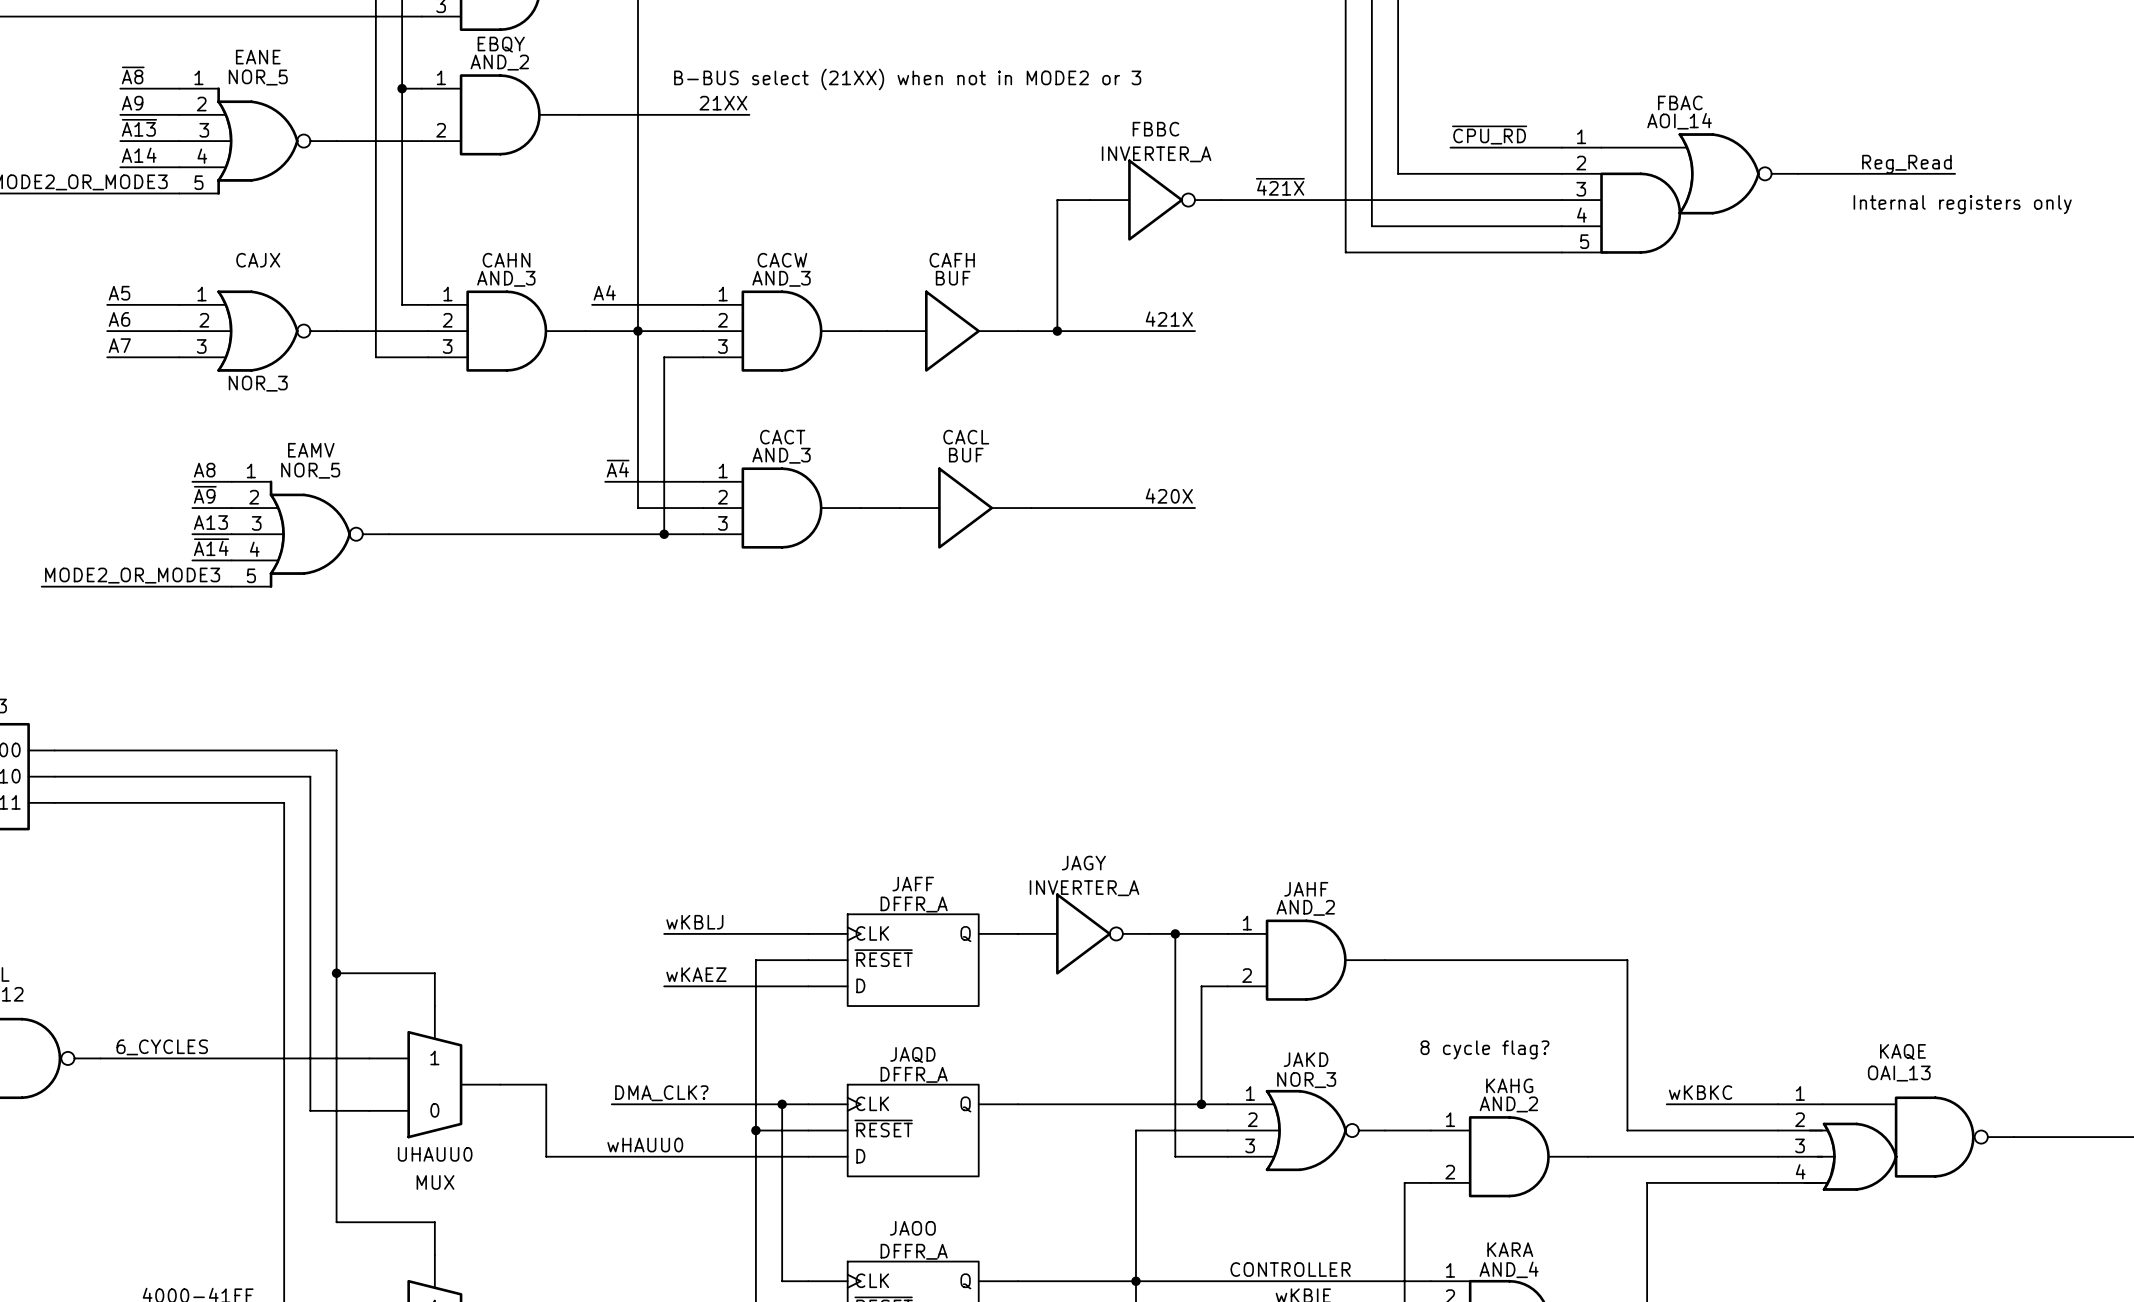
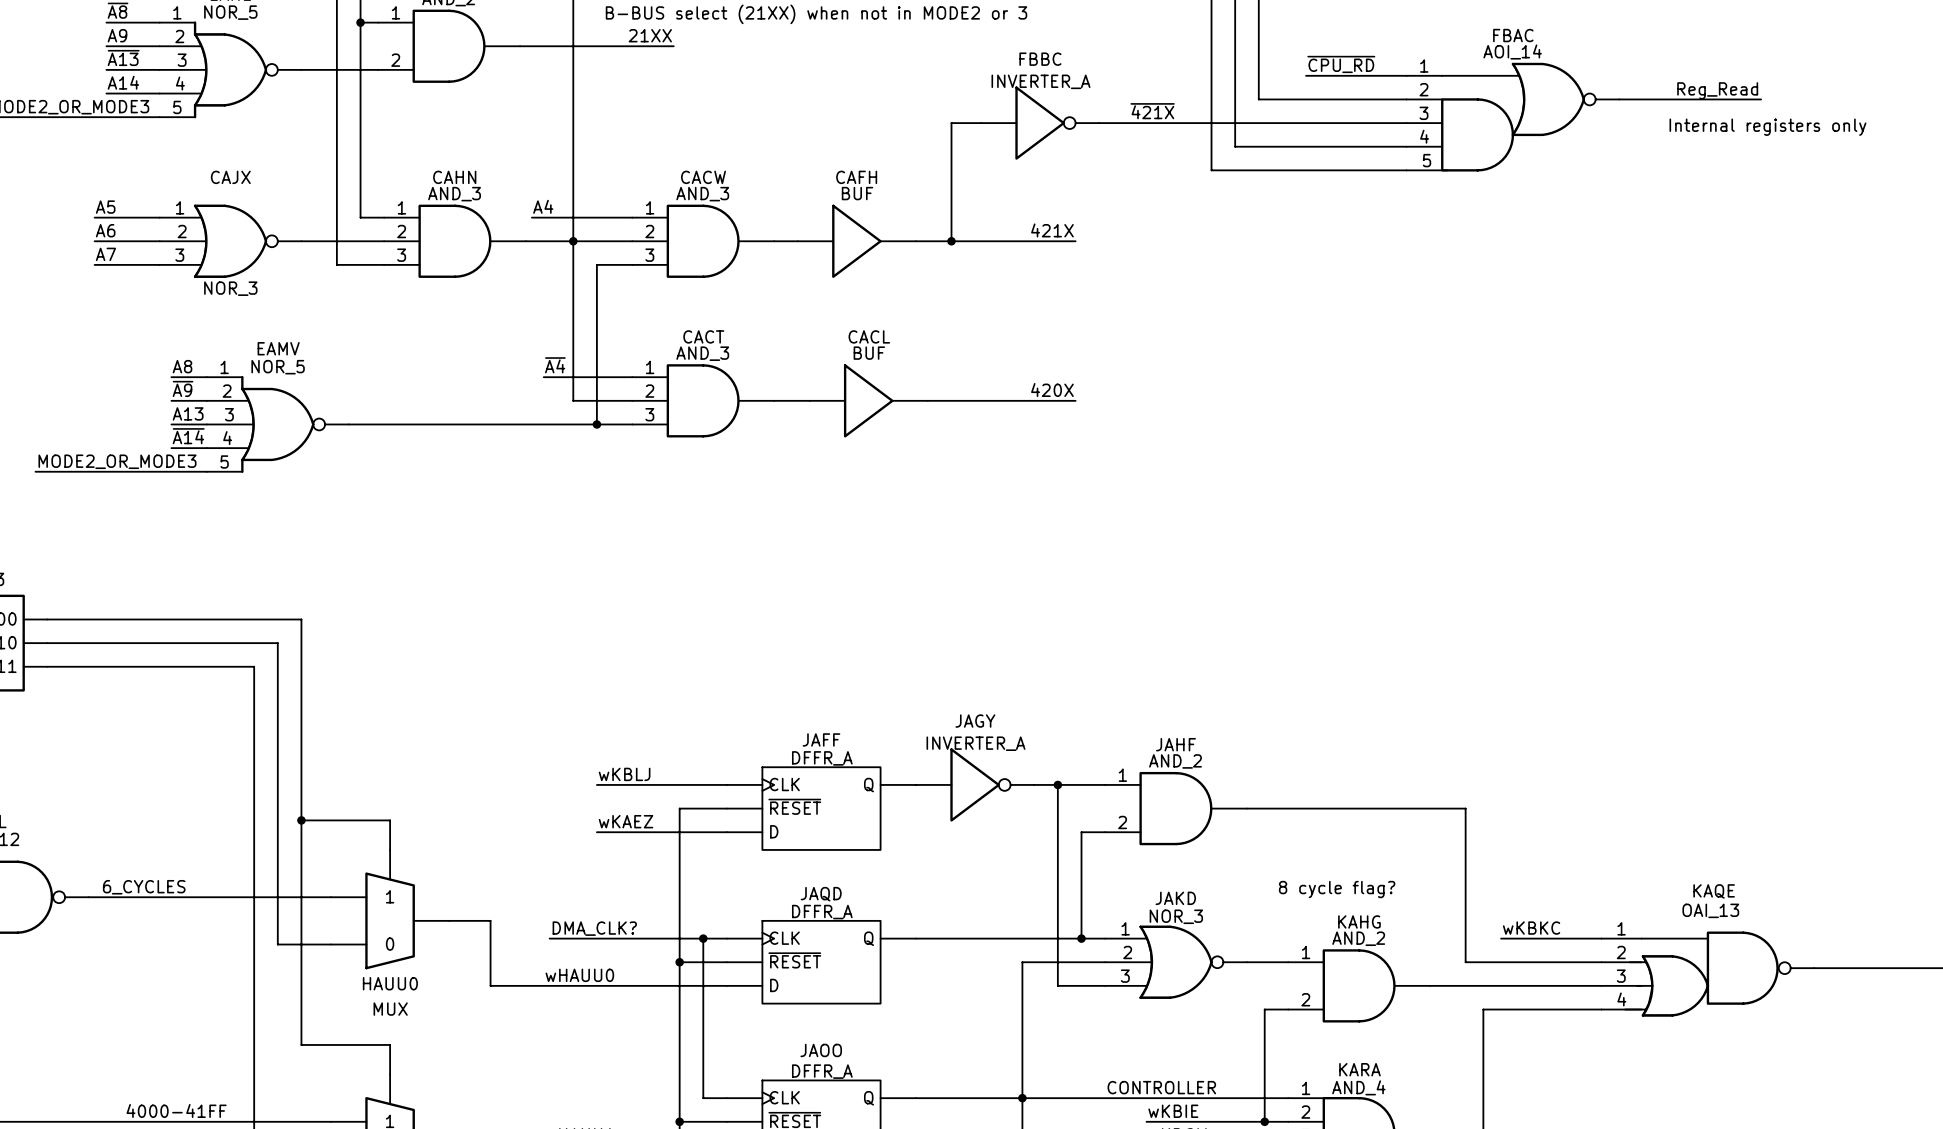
UHAUU0 name: UHAUU0 (435, 1154) -> HAUU0 (390, 983)

